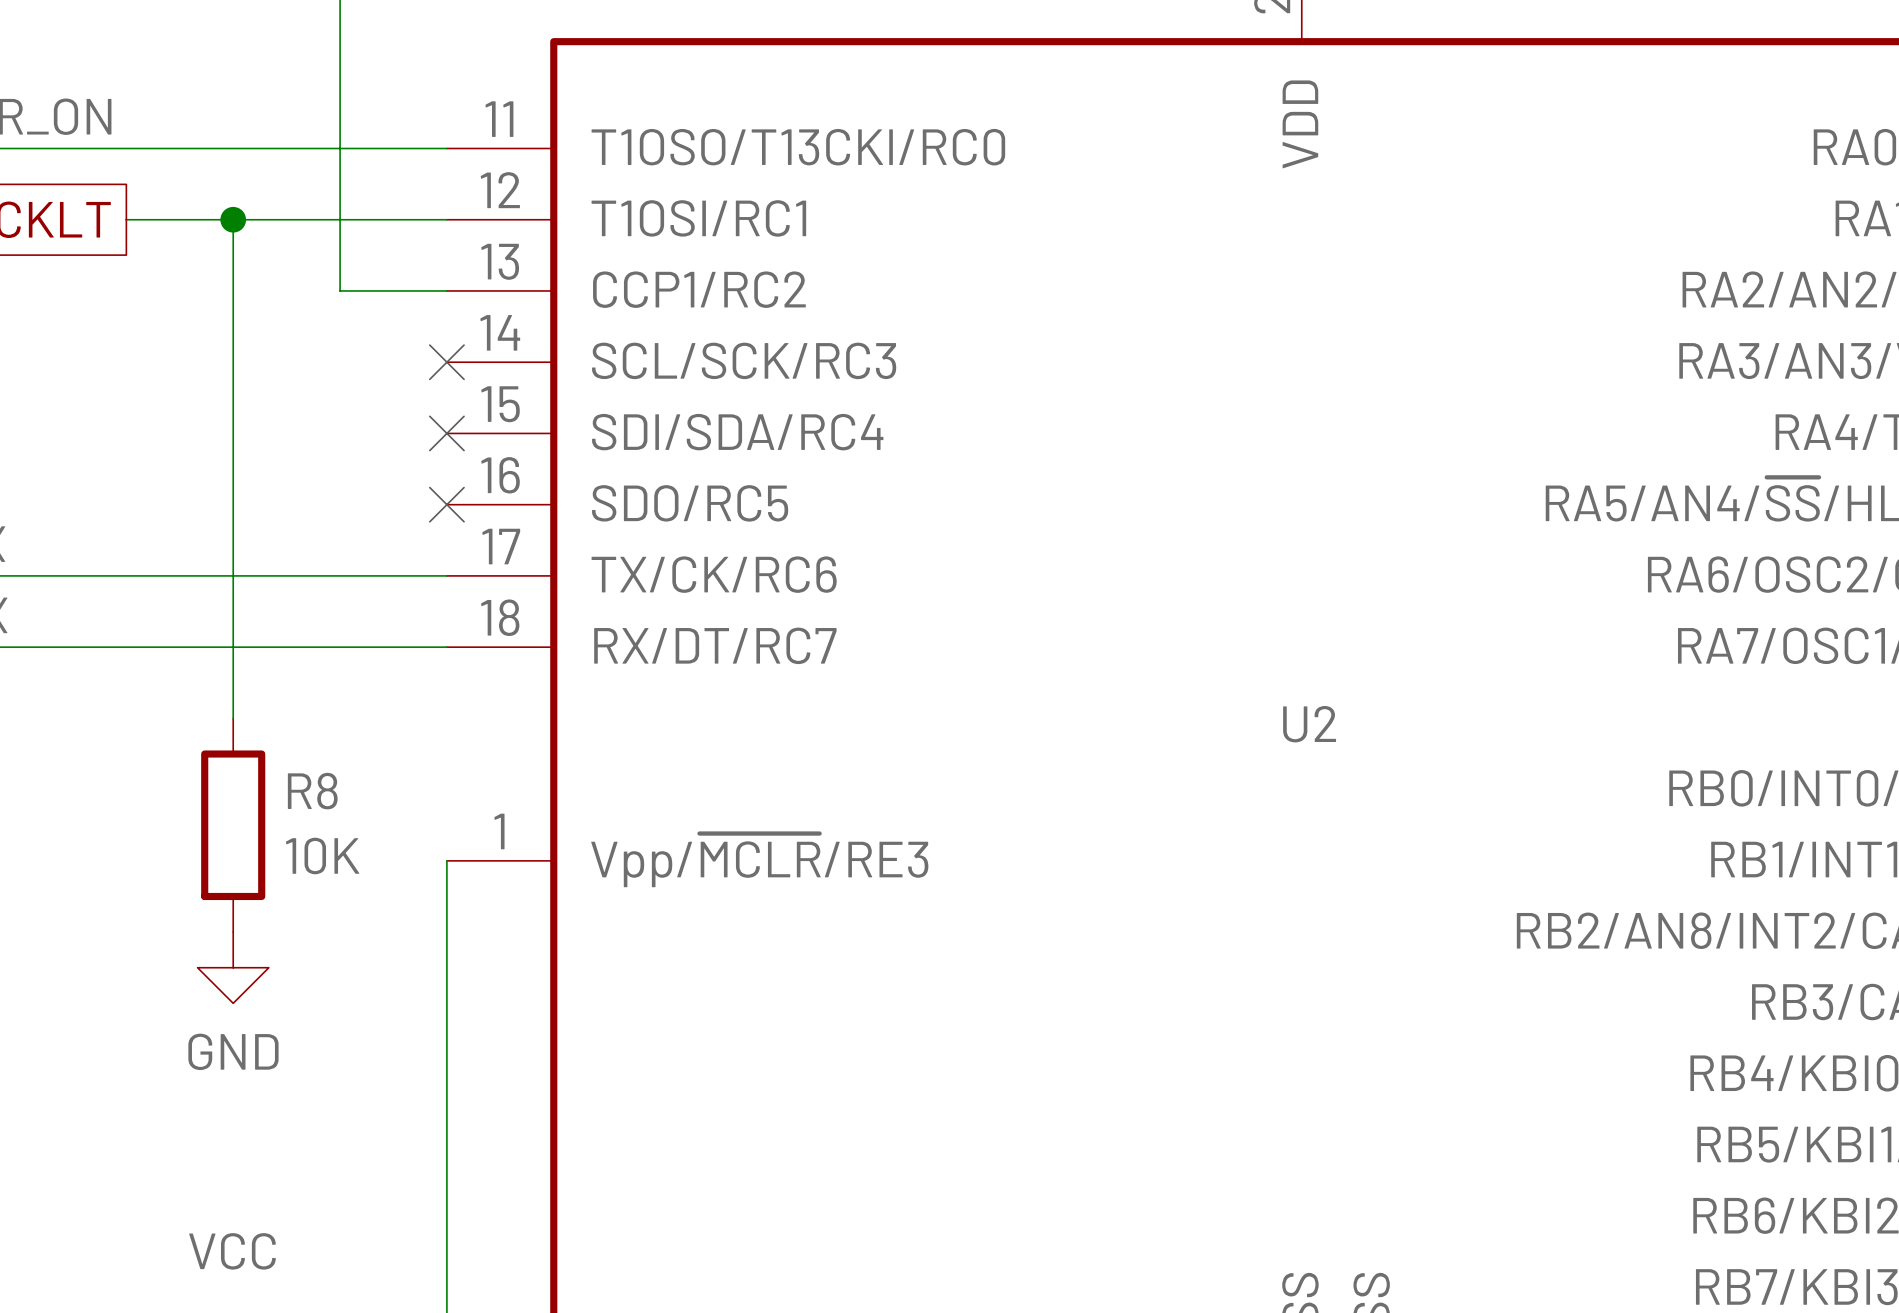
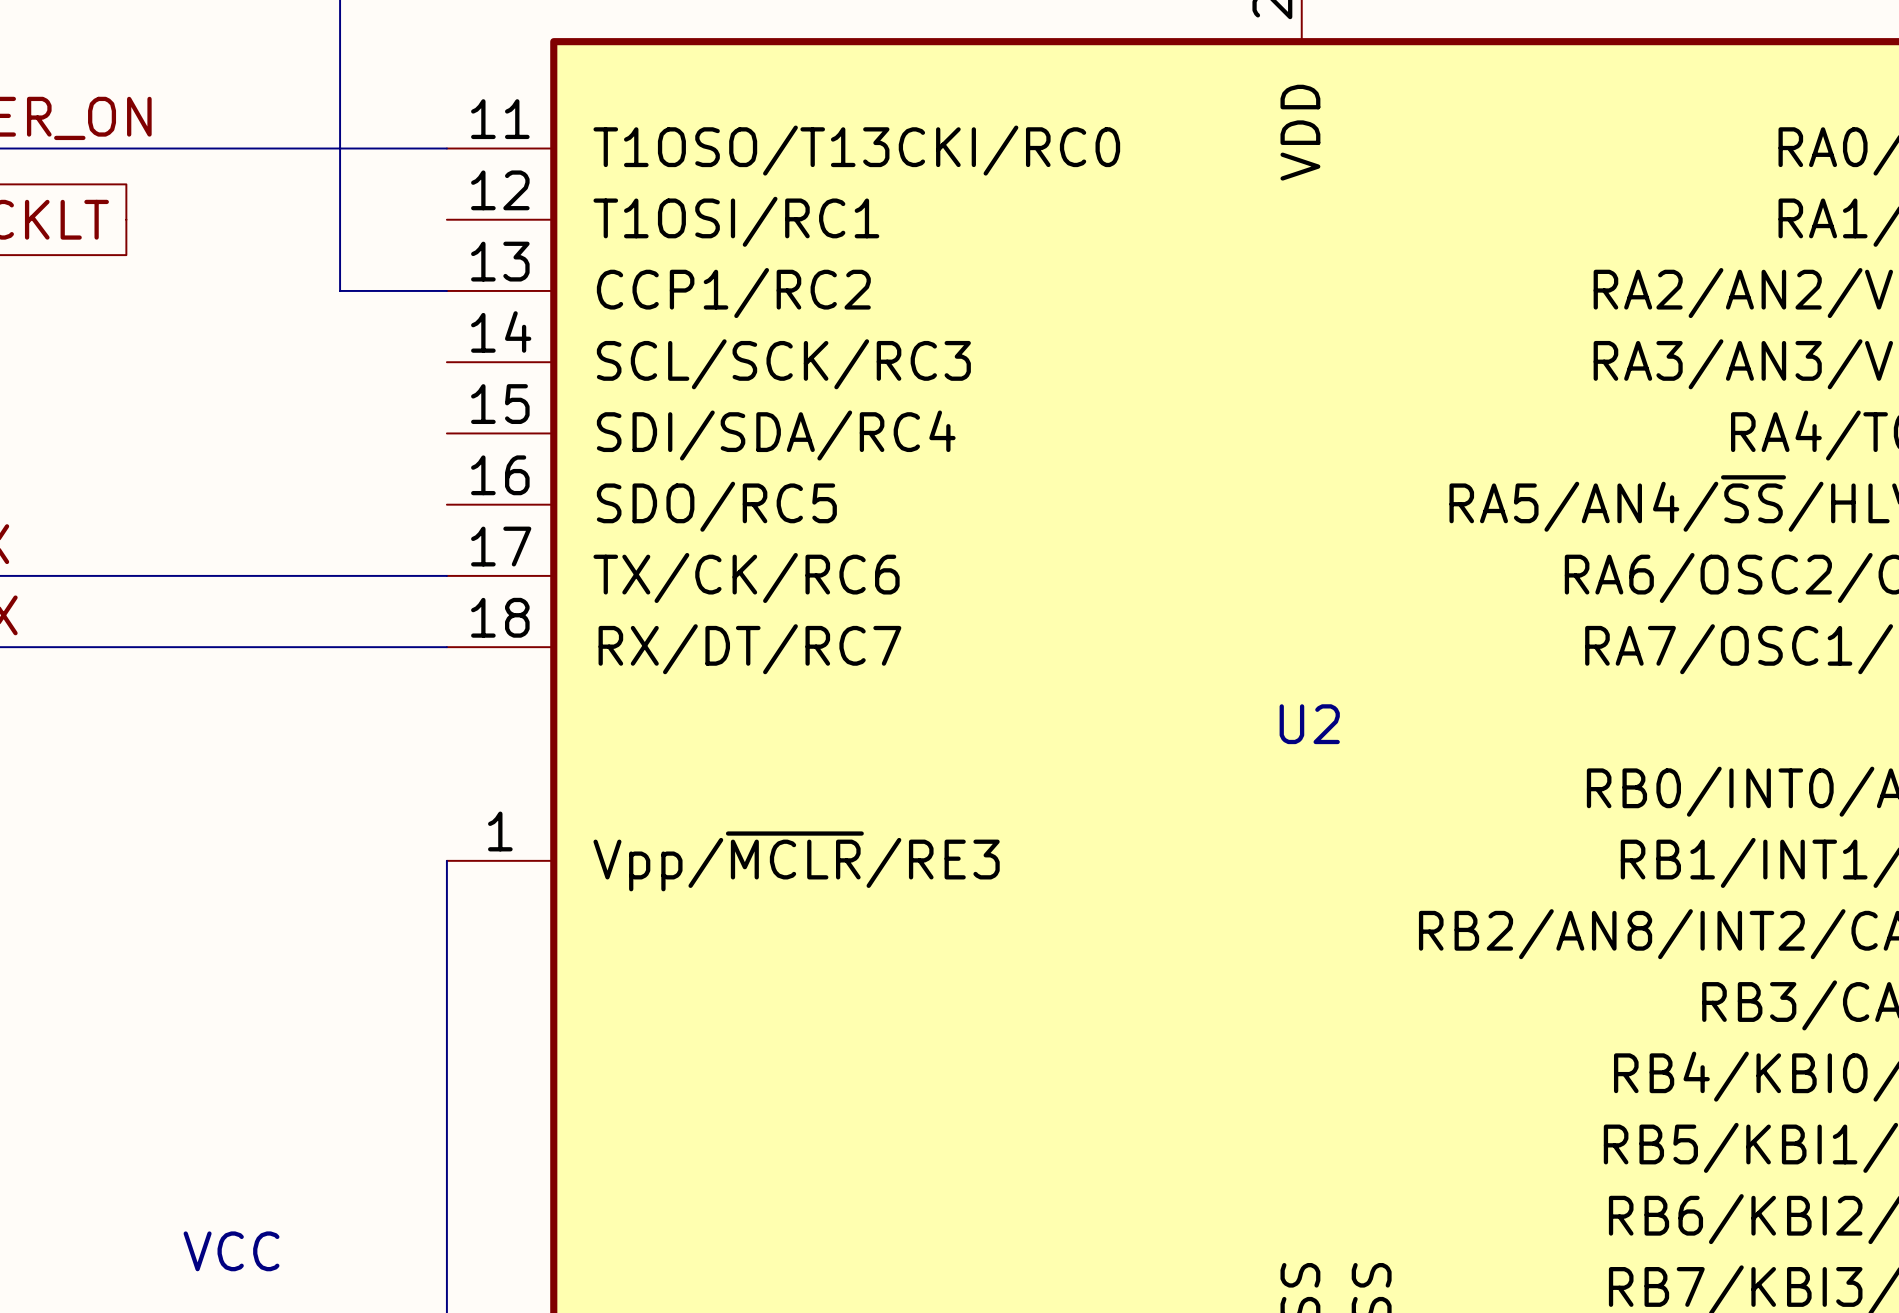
wire: (126, 219) (446, 219) -> none
wire: (233, 219) (233, 718) -> none
junction: (233, 219) -> none
no-connect mark: (446, 362) -> none
no-connect mark: (446, 433) -> none
no-connect mark: (446, 504) -> none
R8: 10K (233, 825) -> none
power symbol: GND (233, 967) -> none

